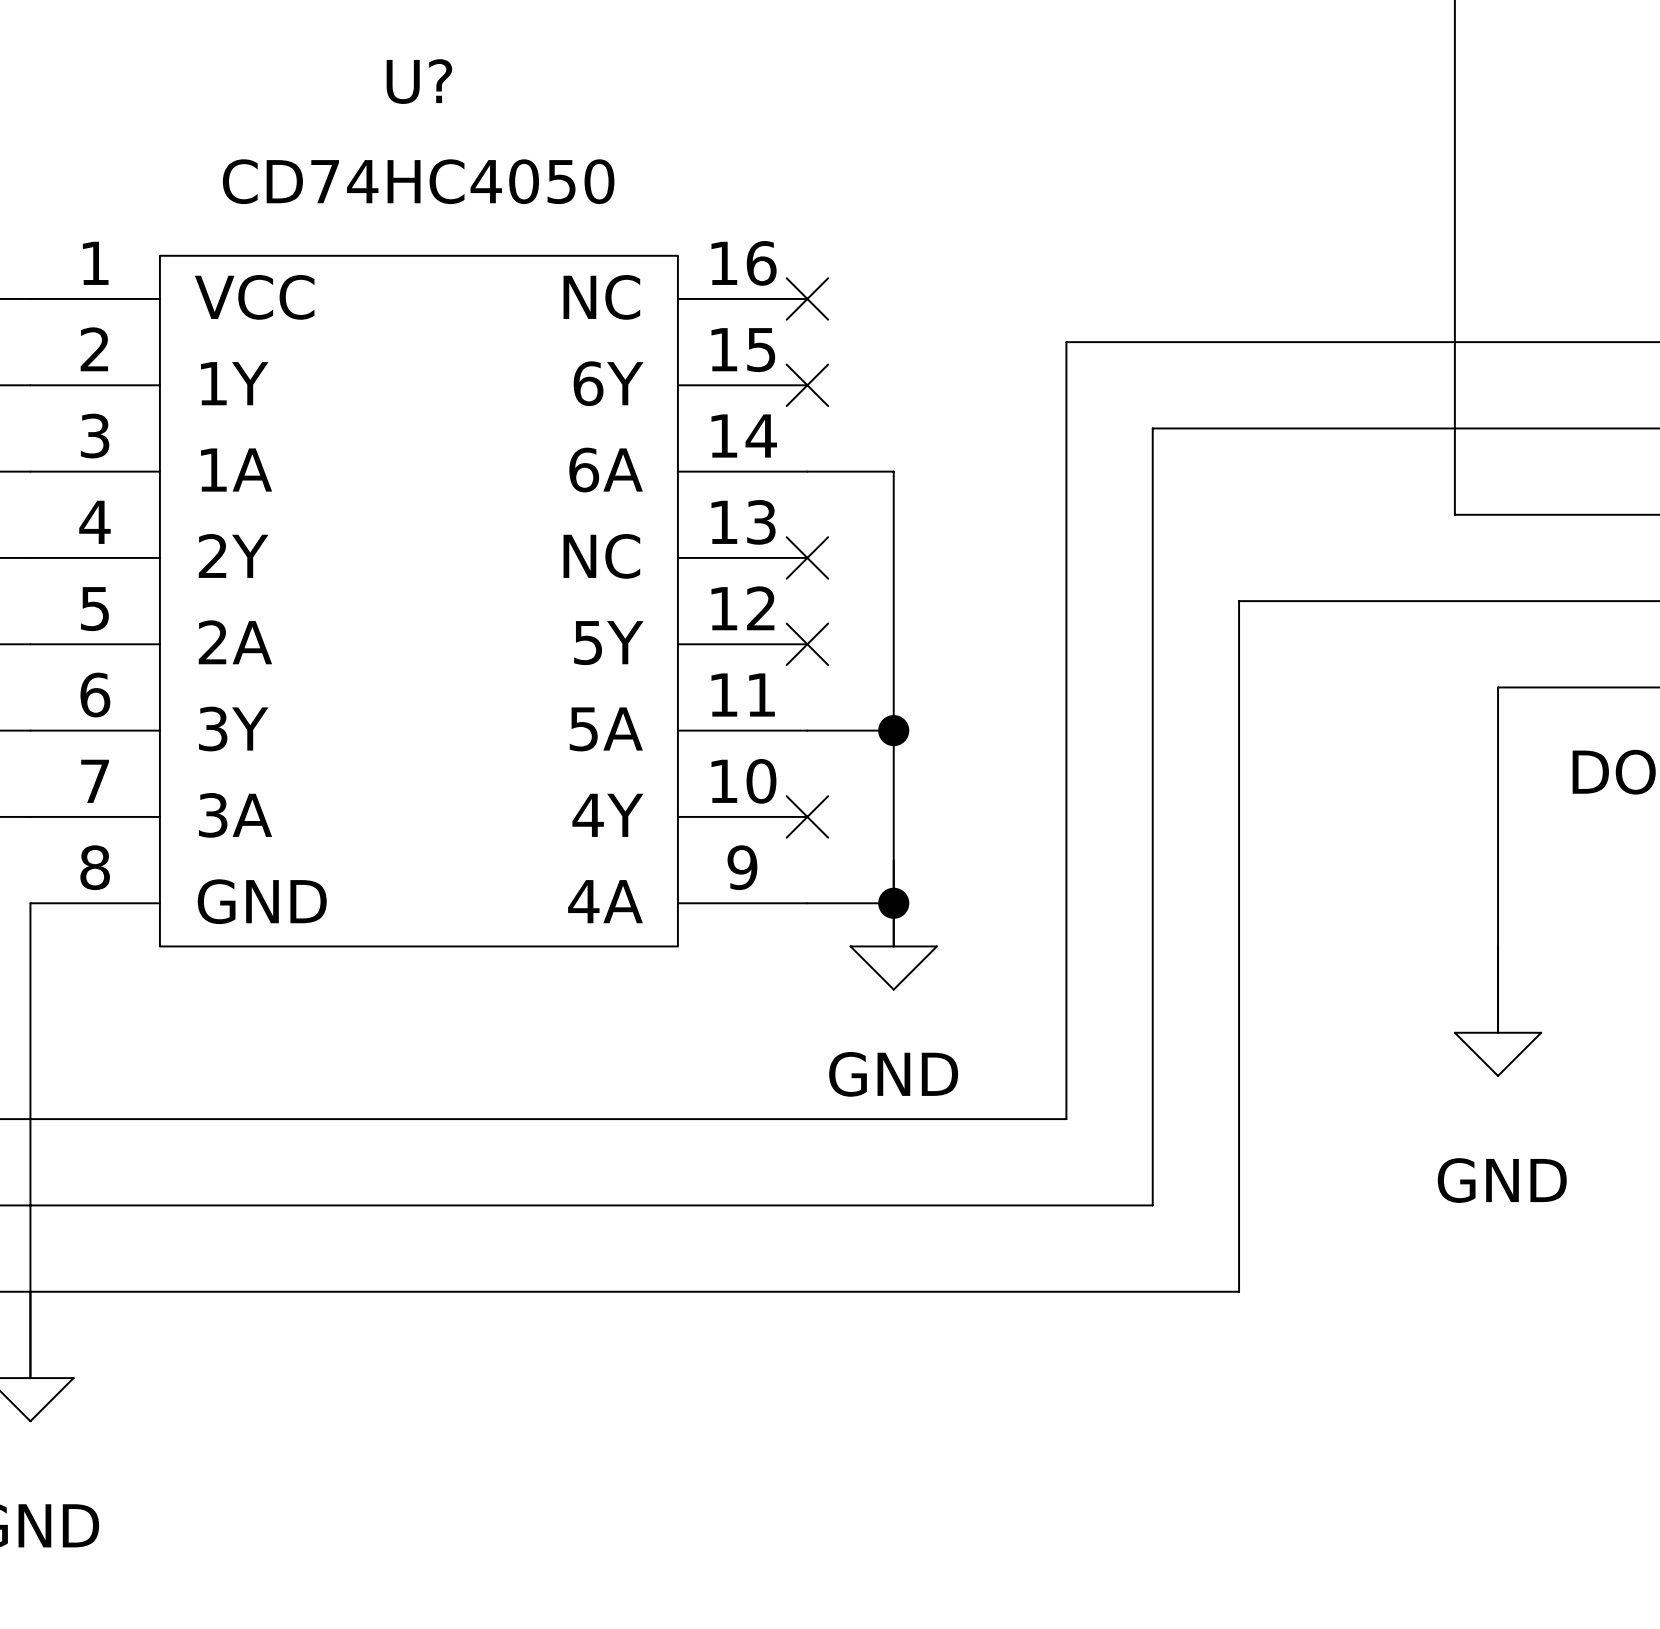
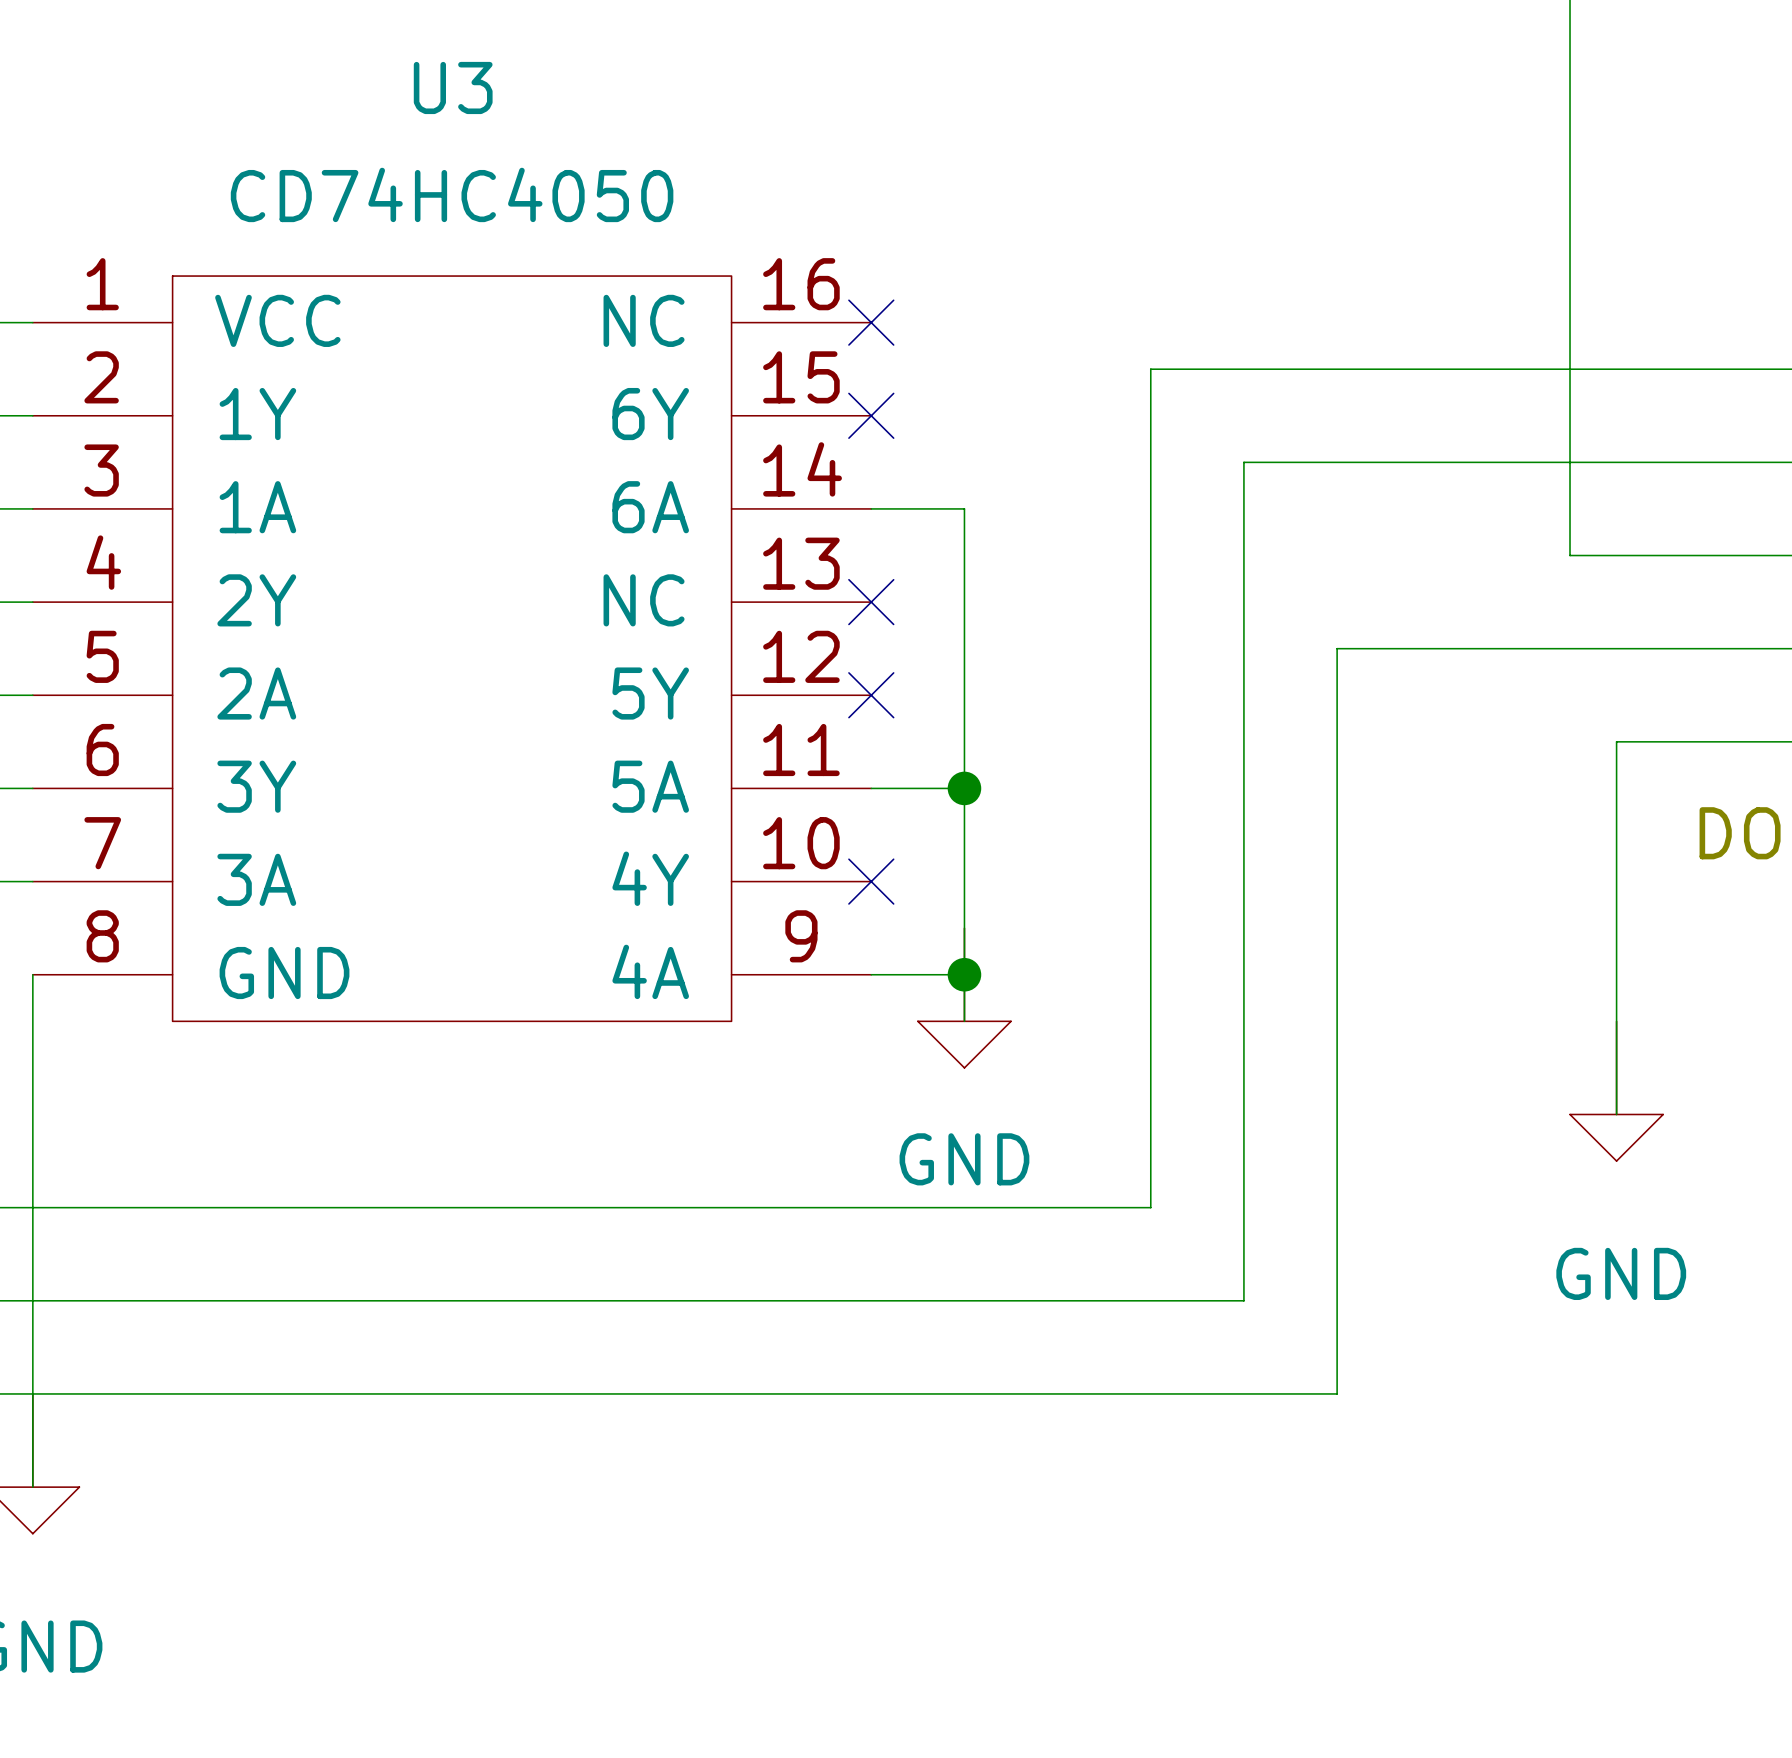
U? name: U? (419, 81) -> U3 (453, 87)

